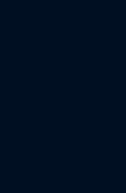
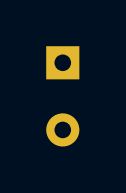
part: none -> (62, 62)
part: none -> (62, 129)

